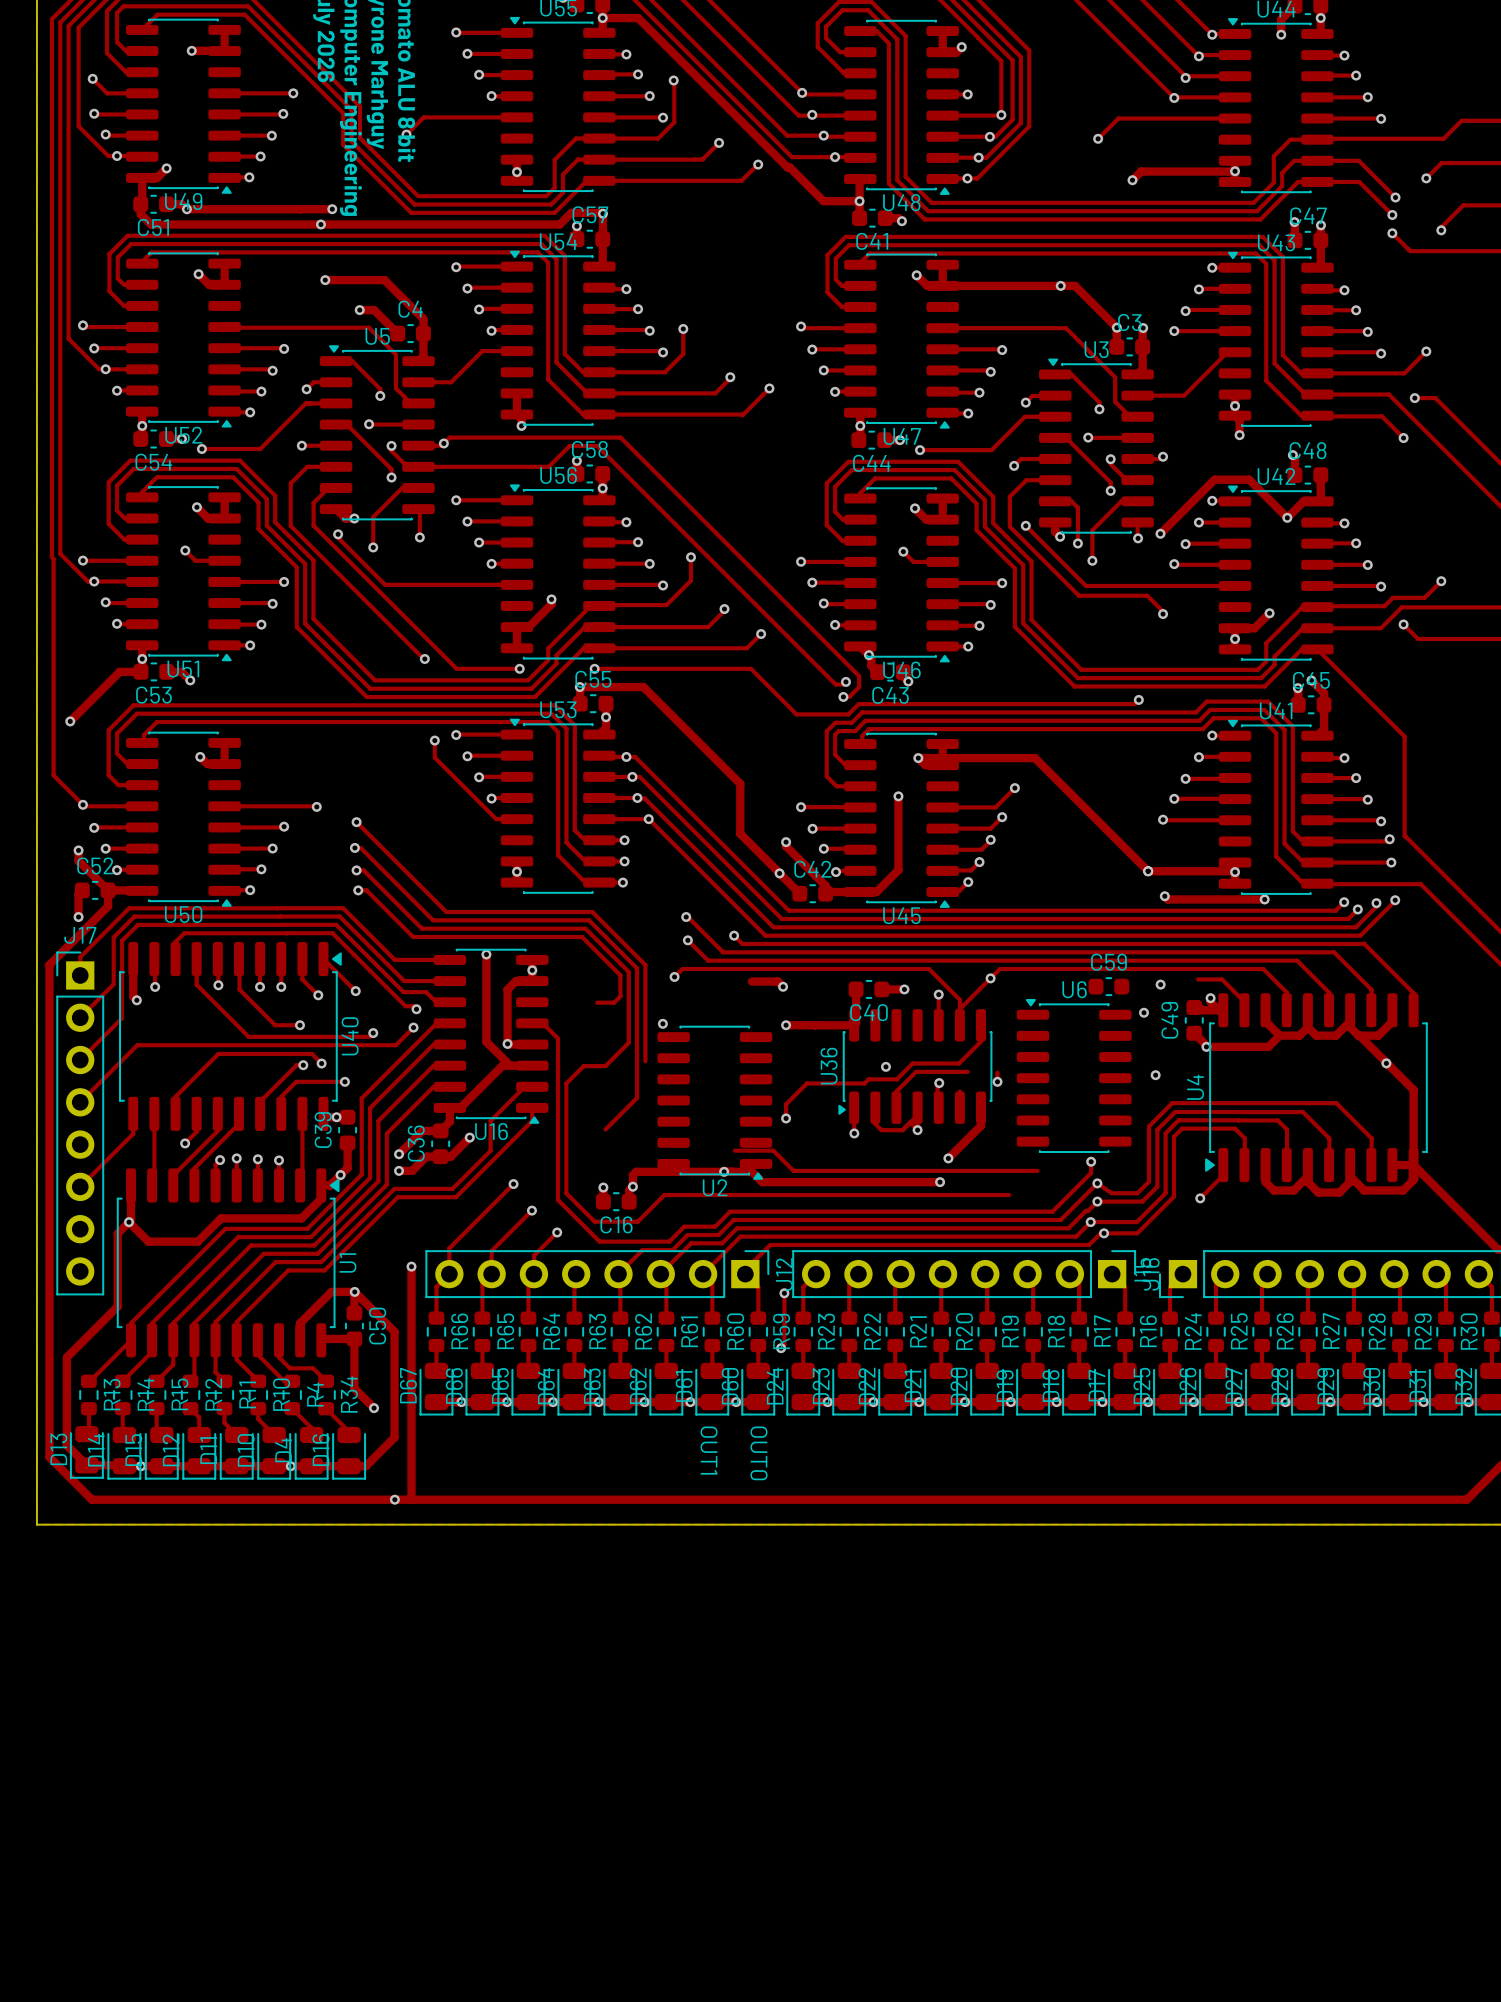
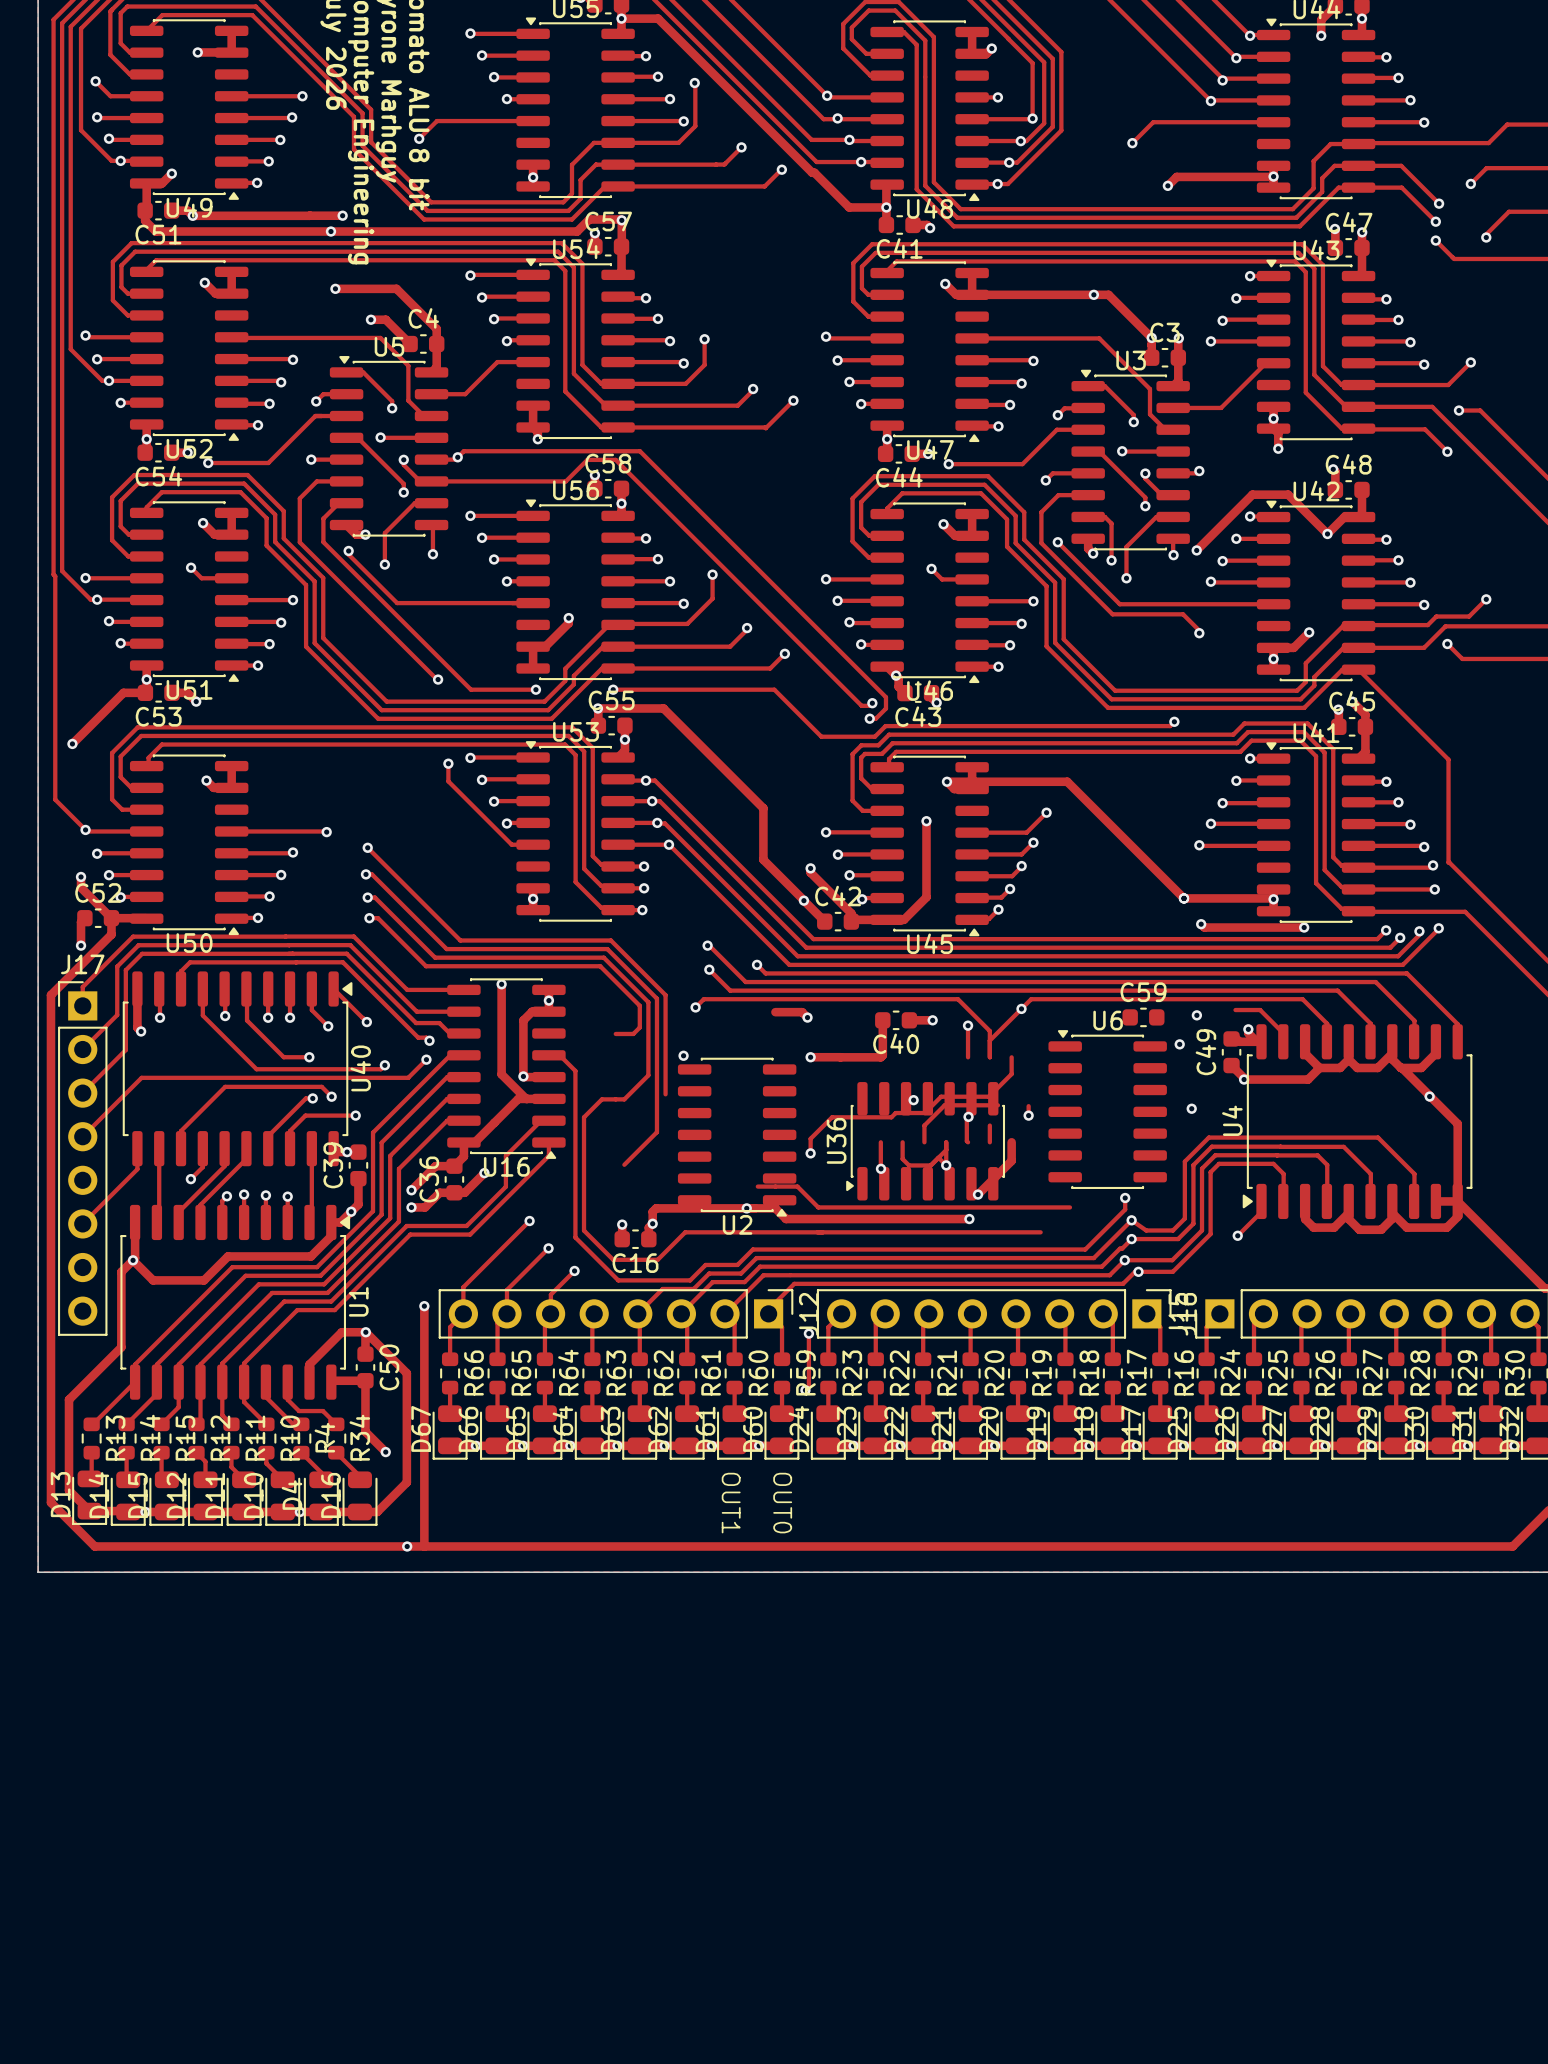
U36 position: (915, 1066) -> (925, 1141)

